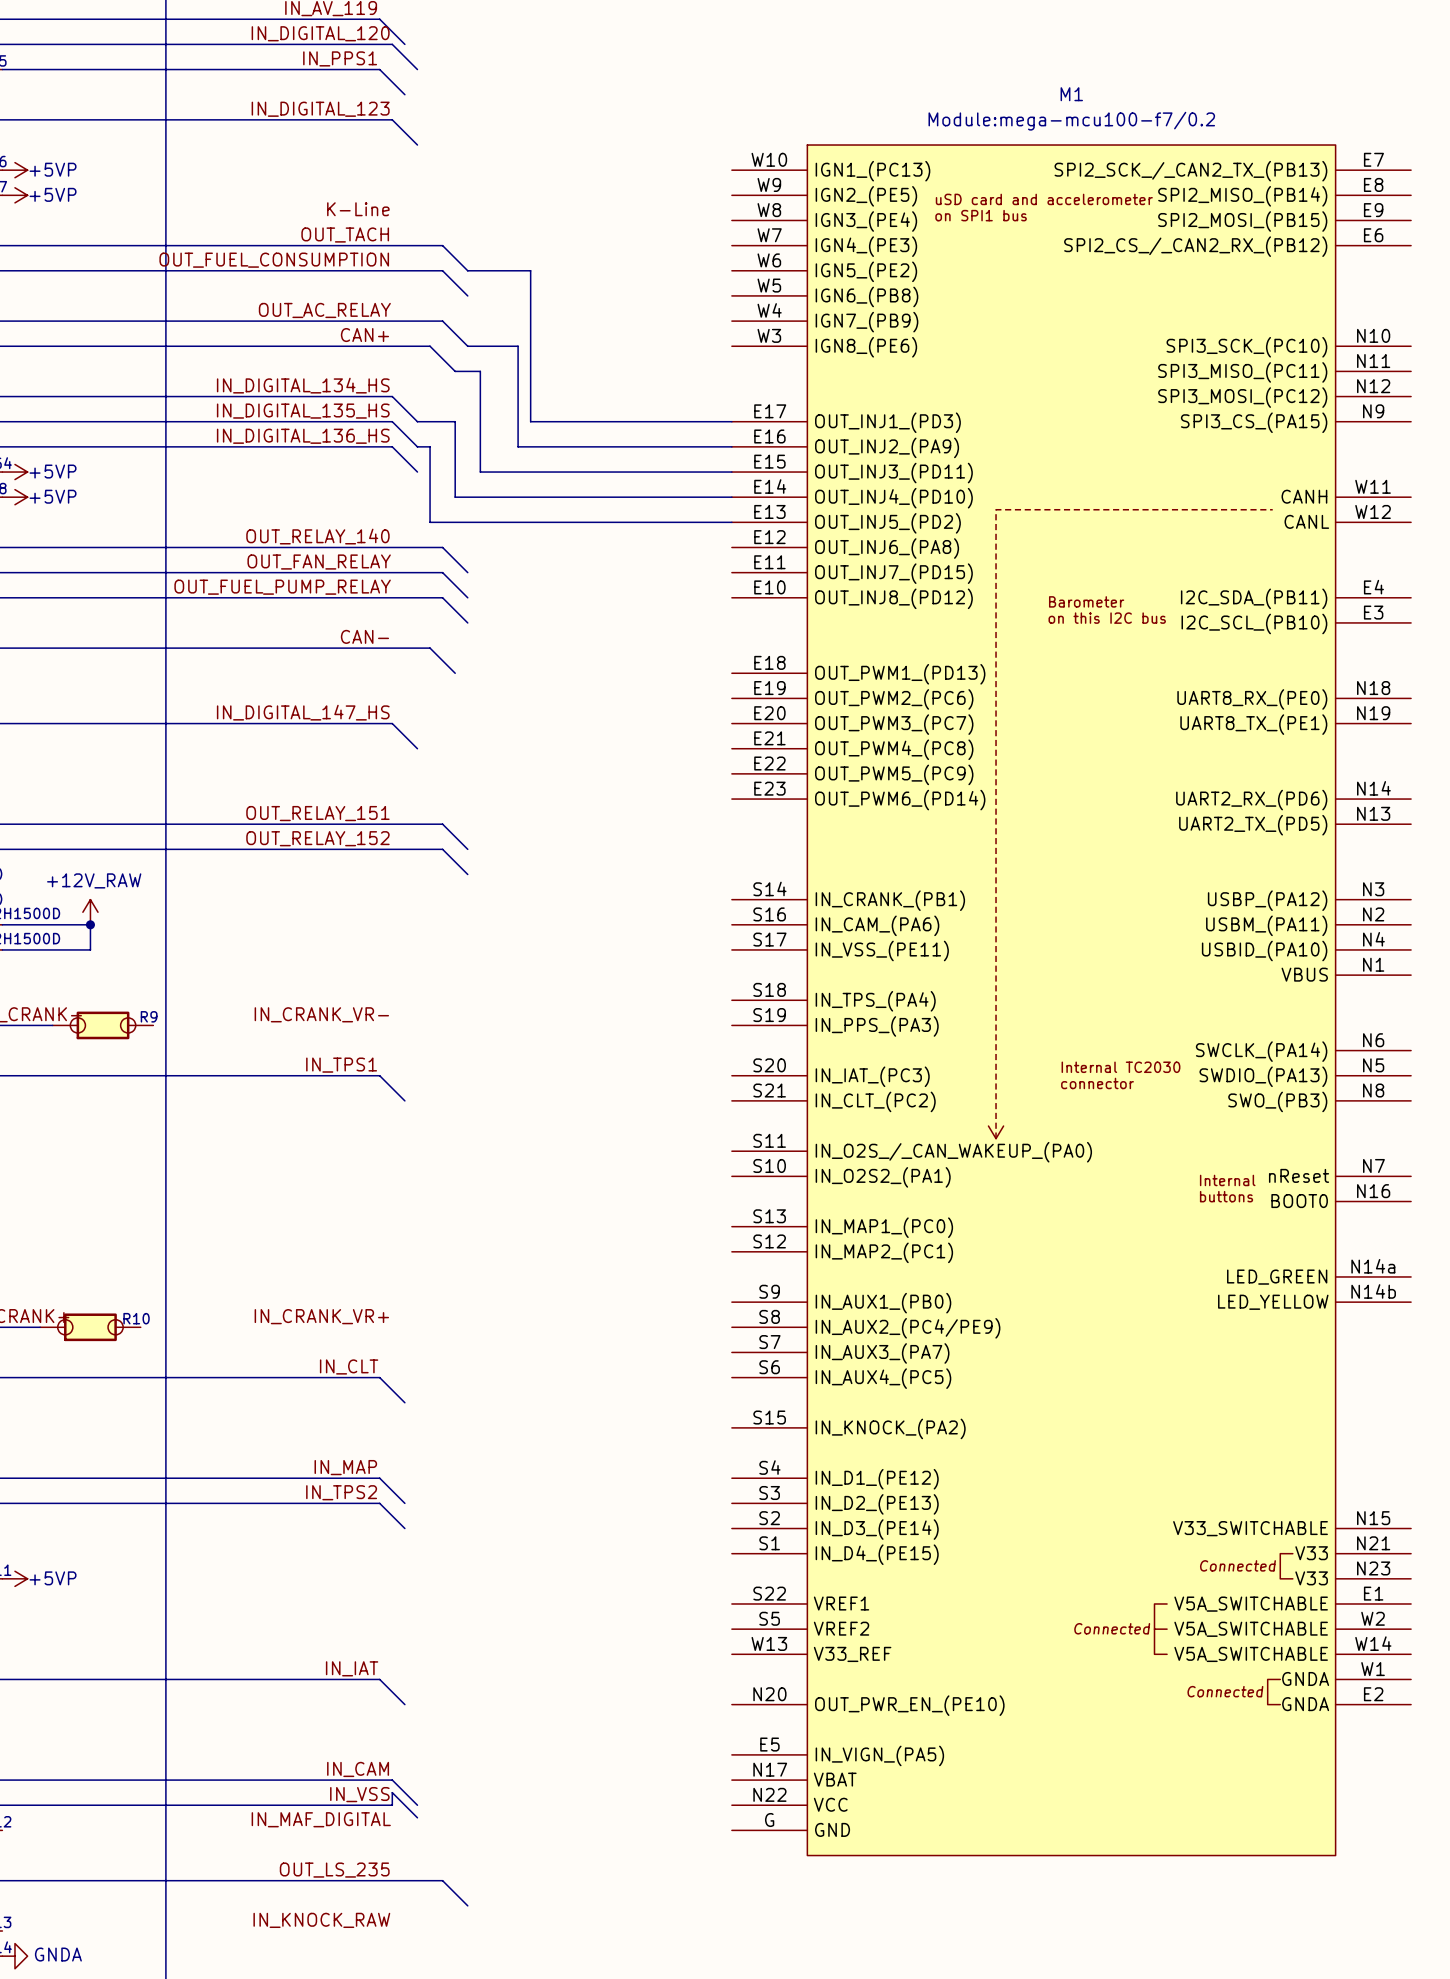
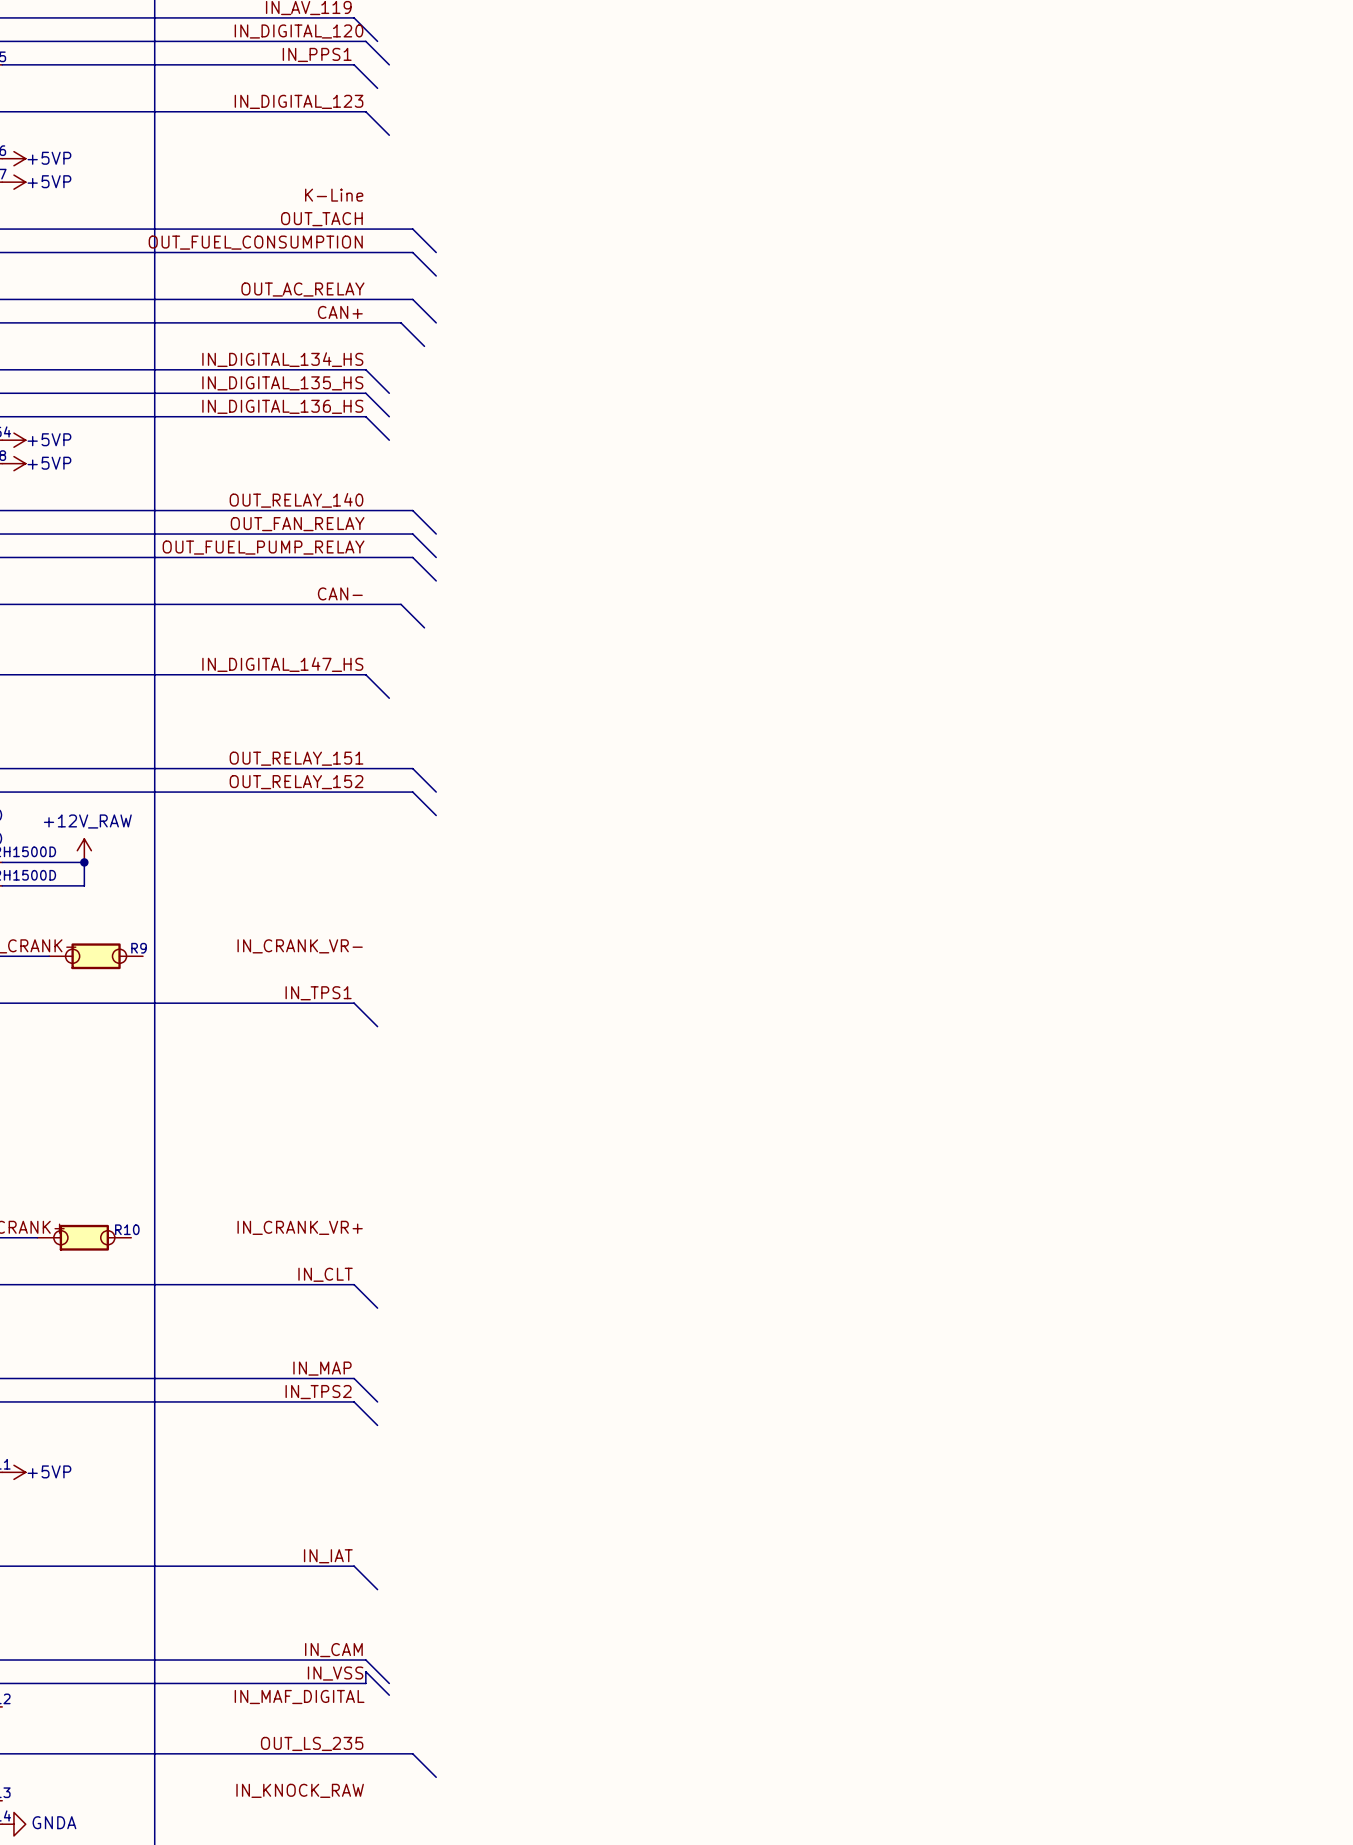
wire: (467, 270) (530, 270) (530, 421) (731, 421) -> none
wire: (467, 346) (518, 346) (518, 446) (731, 446) -> none
wire: (455, 371) (480, 371) (480, 472) (731, 472) -> none
wire: (417, 421) (455, 421) (455, 497) (731, 497) -> none
wire: (417, 446) (430, 446) (430, 522) (731, 522) -> none
M1: Module:mega-mcu100-f7/0.2 (1071, 1000) -> none

